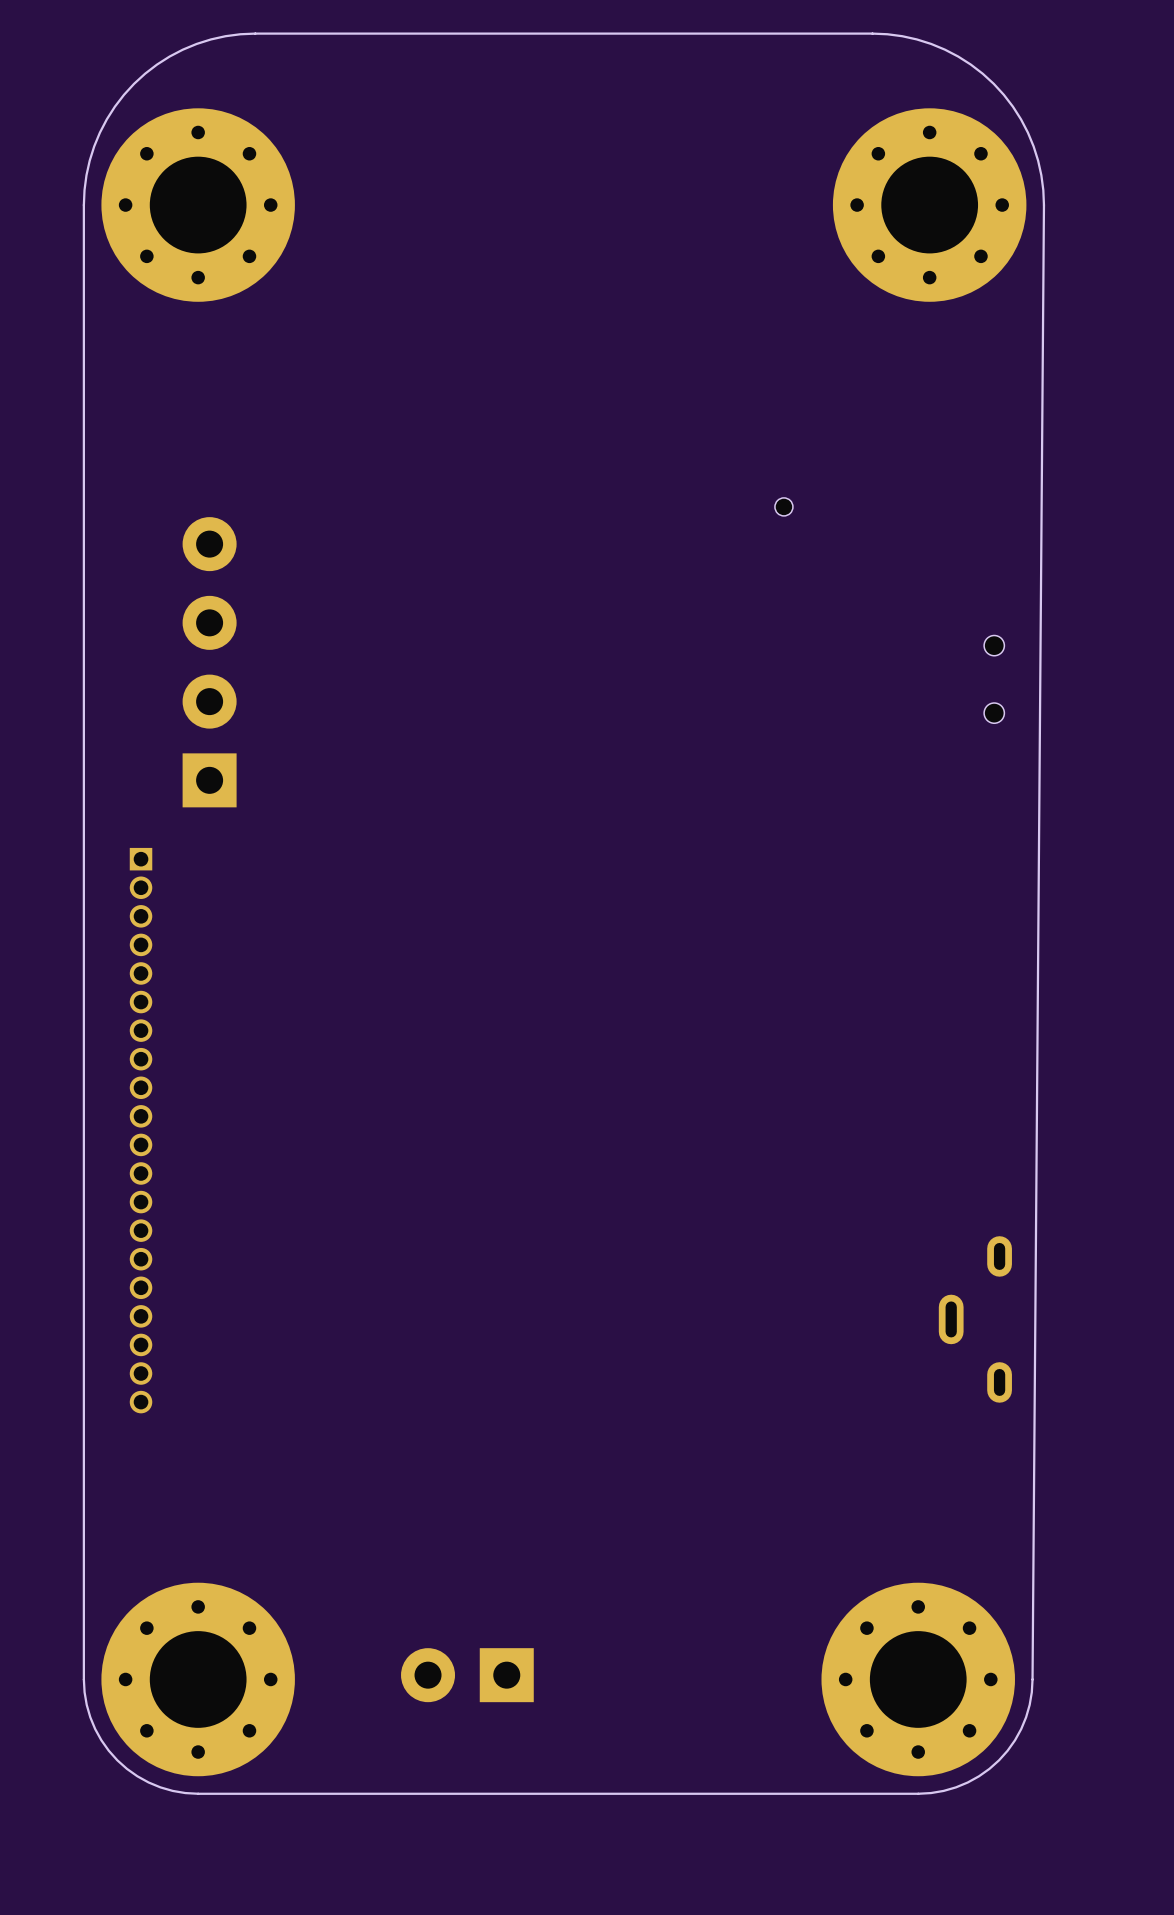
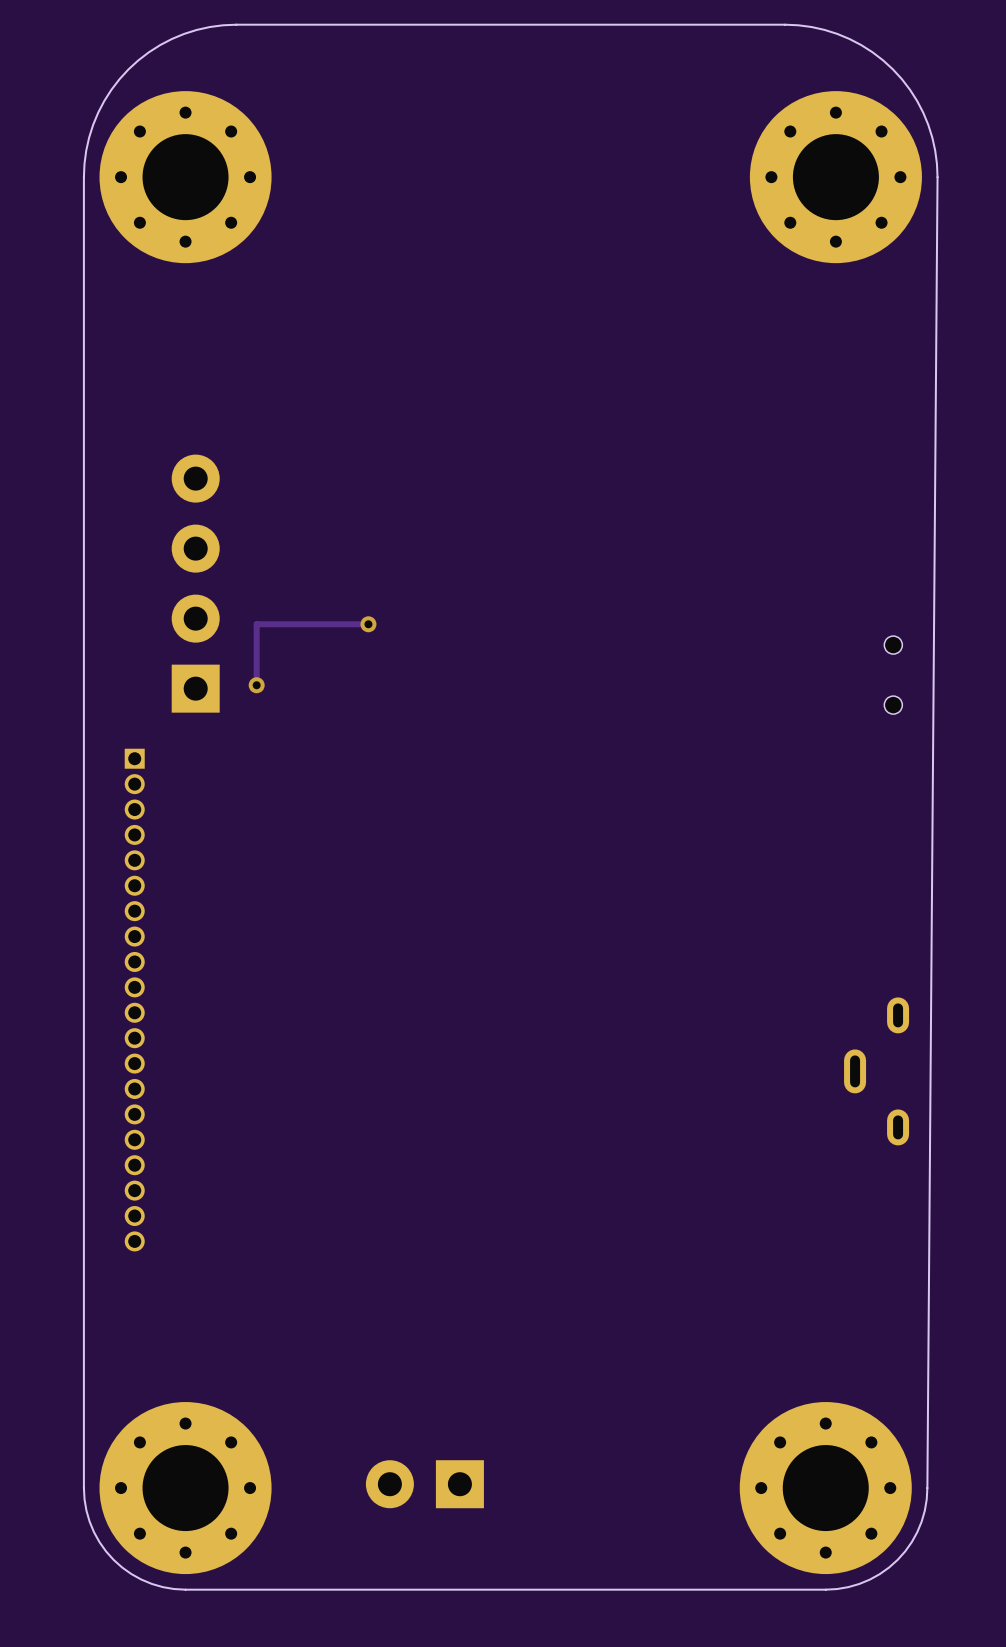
part: (783, 506) -> none
part position: (994, 679) -> (893, 675)
track: none -> (368, 624) (256, 624) (256, 685)
via: none -> (368, 624)
via: none -> (256, 685)
part position: (975, 1319) -> (876, 1071)

